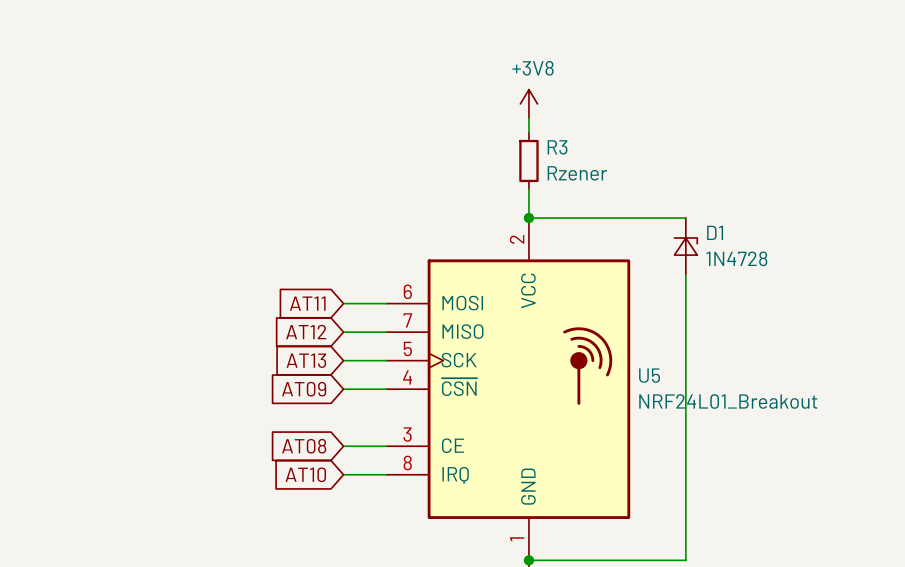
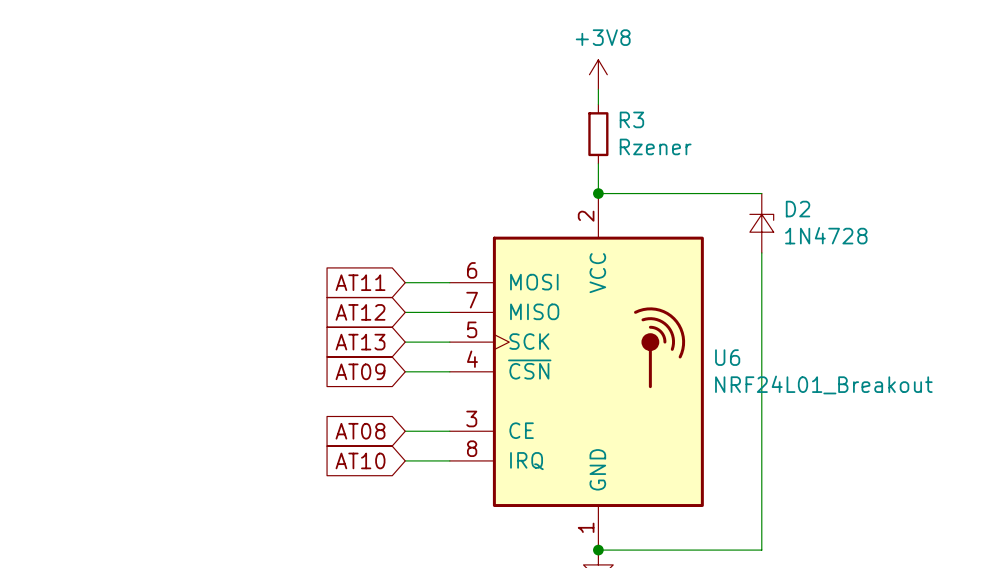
D1 name: D1 (715, 232) -> D2 (798, 209)
U5 name: U5 (649, 375) -> U6 (727, 357)

